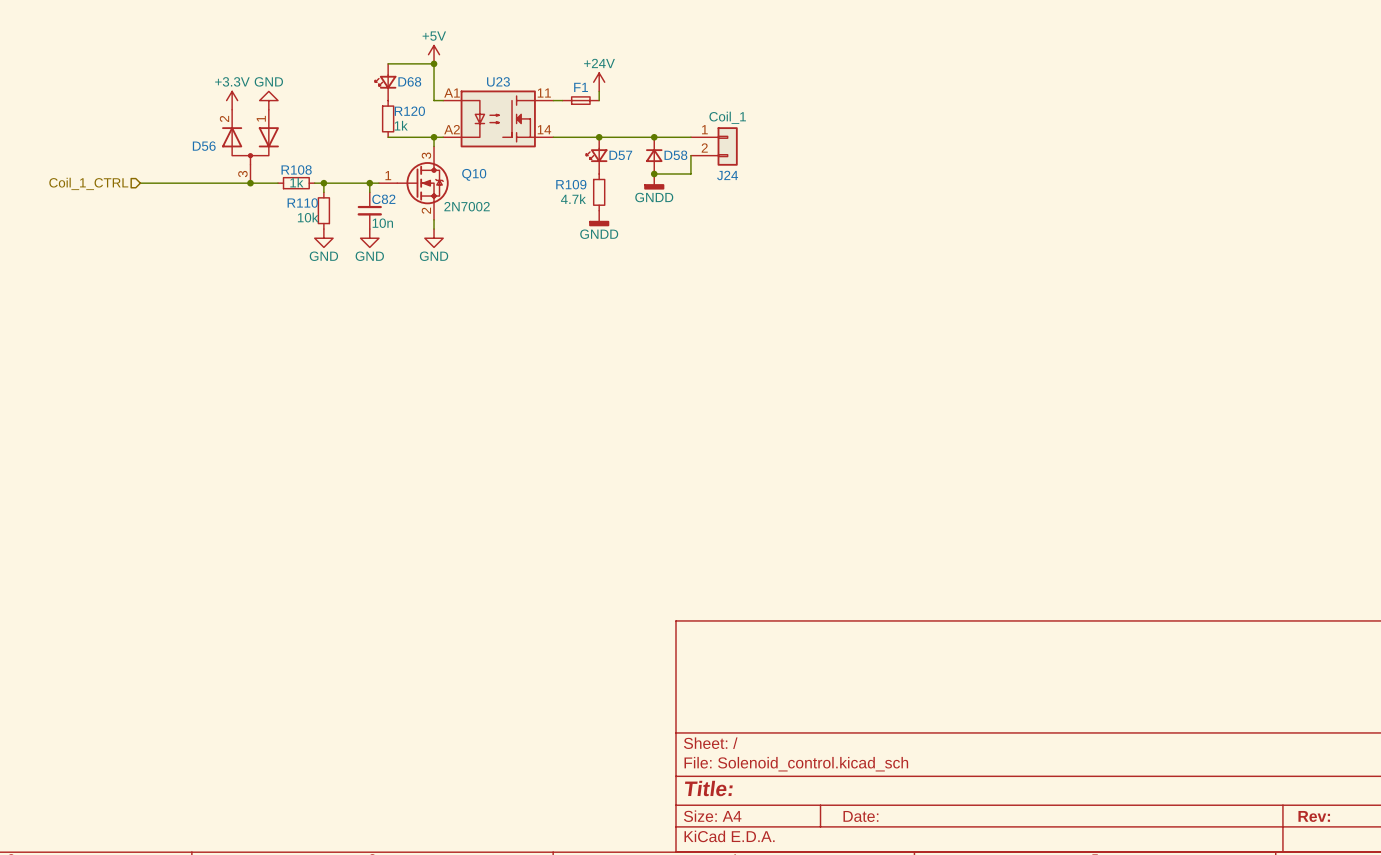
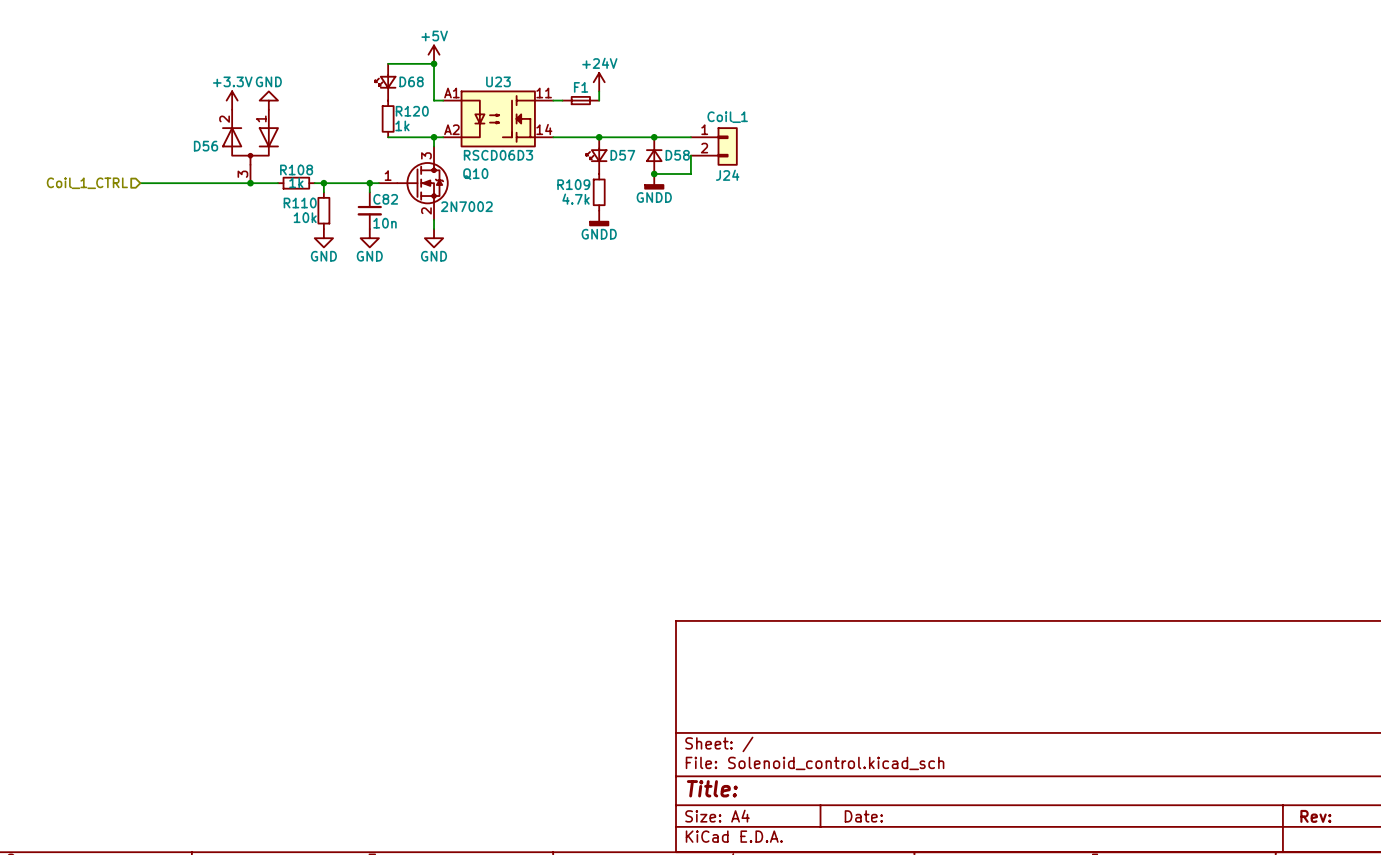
U23 value: none -> RSCD06D3 (498, 155)

